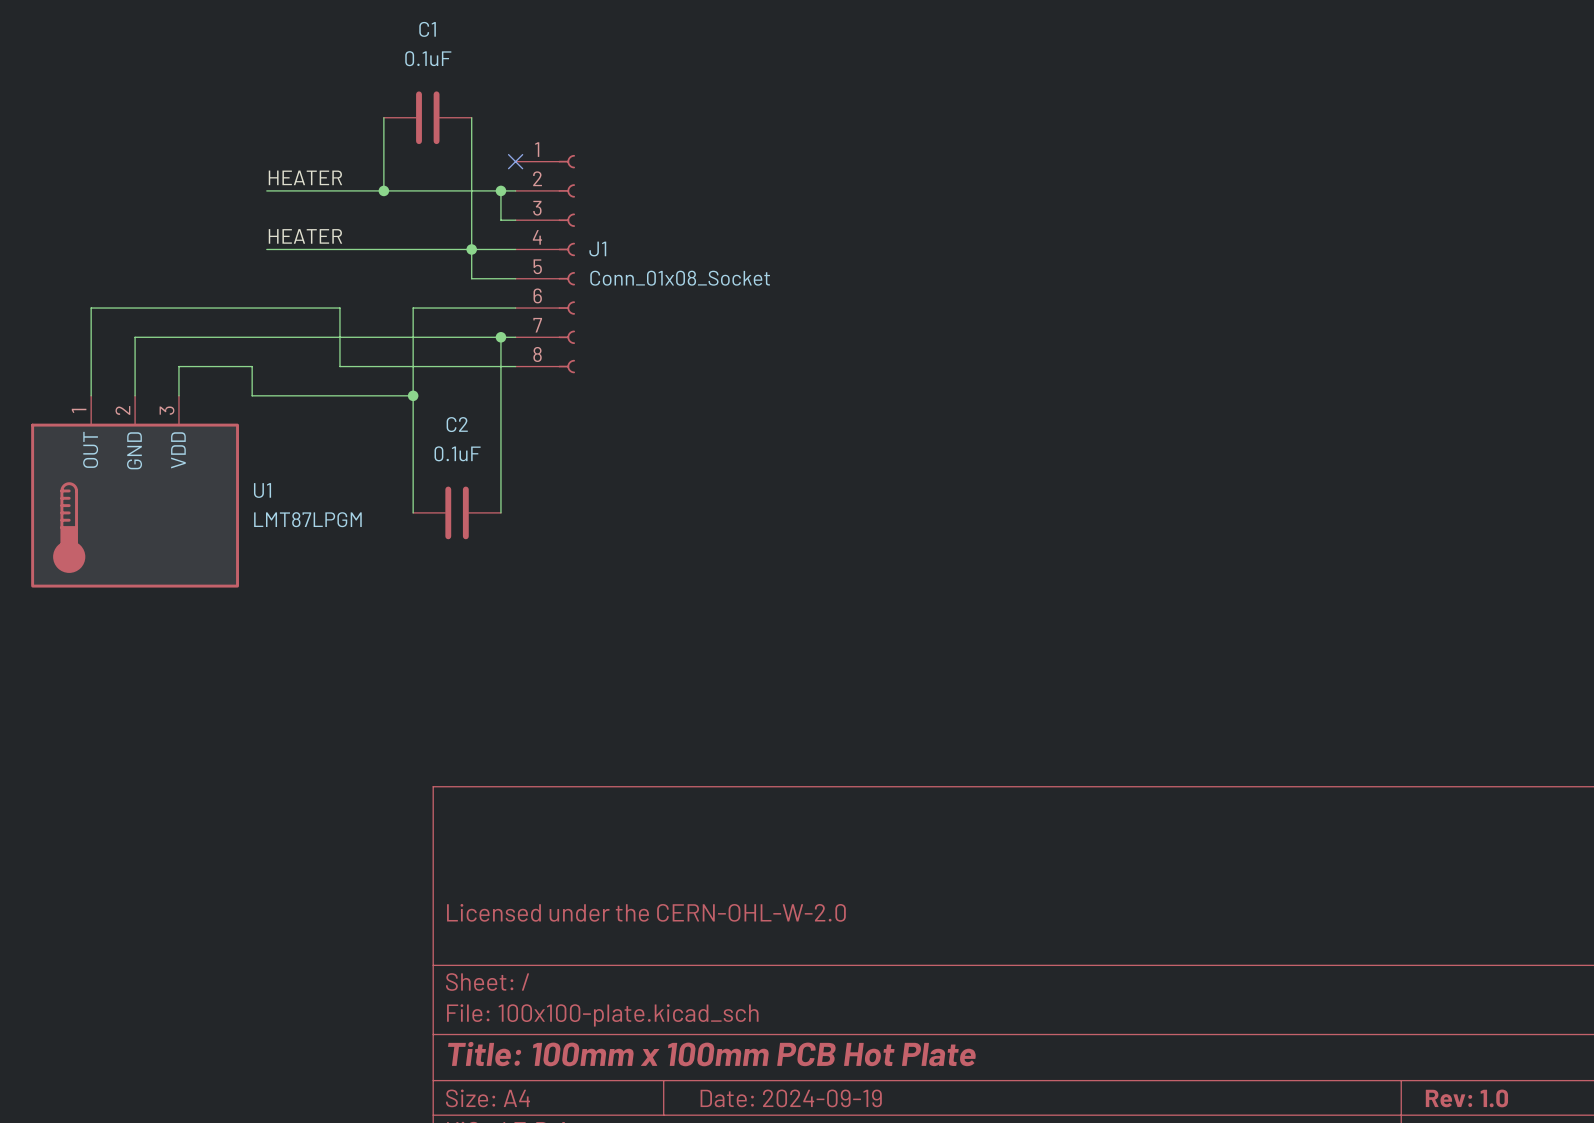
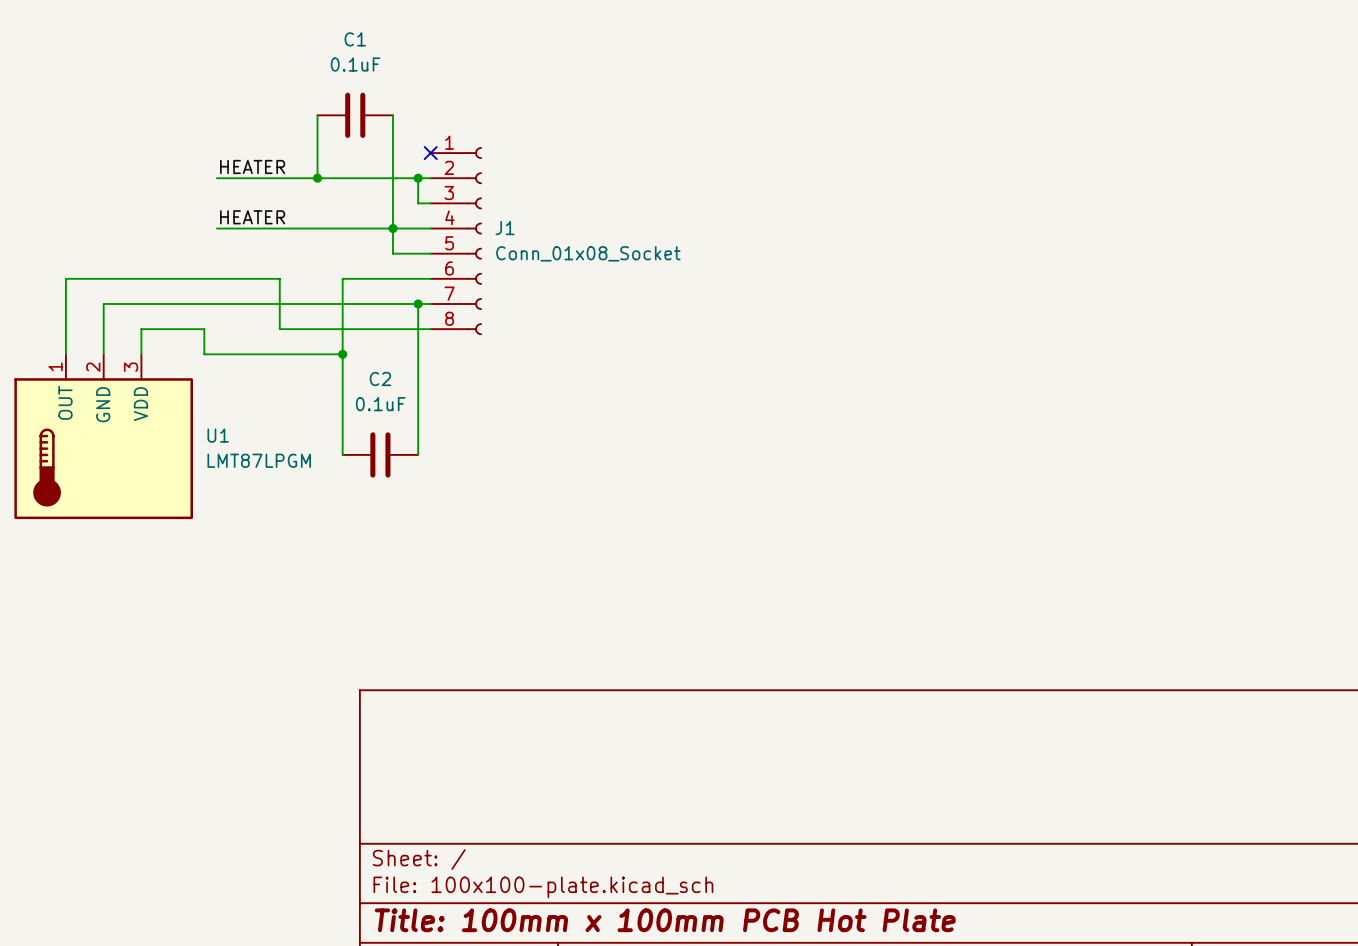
title block: Licensed under the CERN-OHL-W-2.0 (646, 912) -> none

